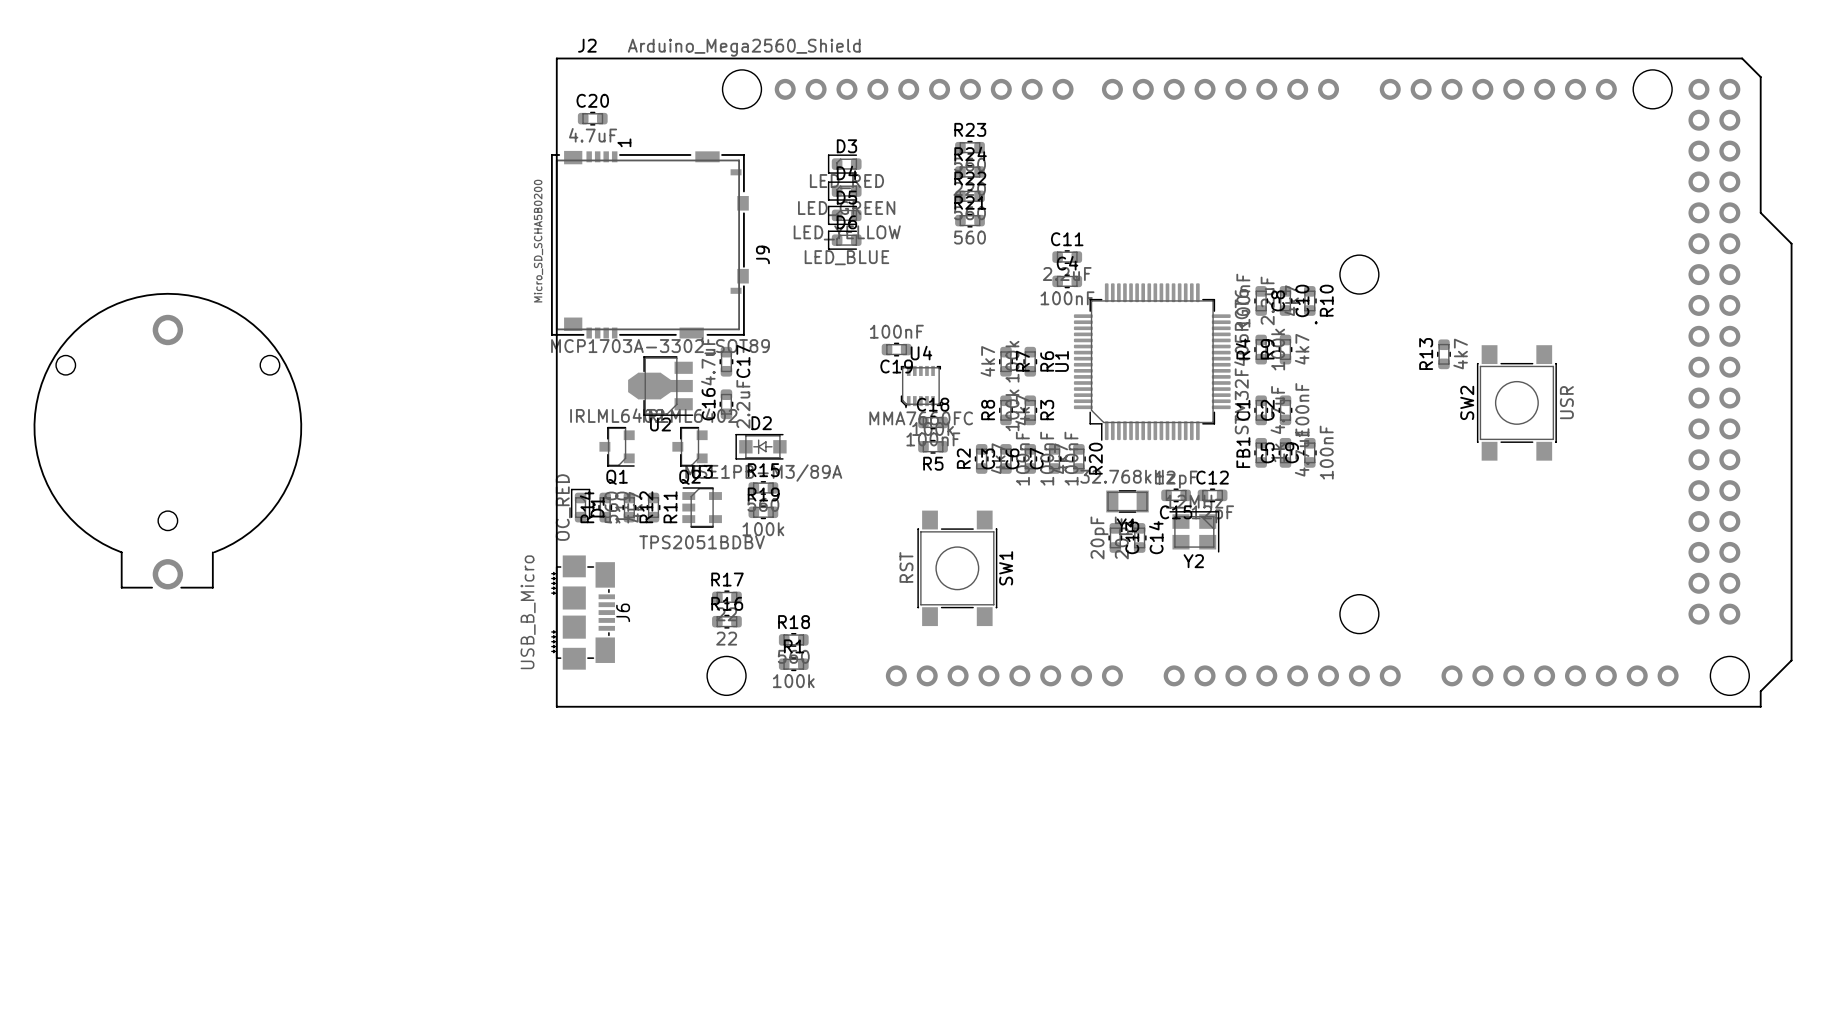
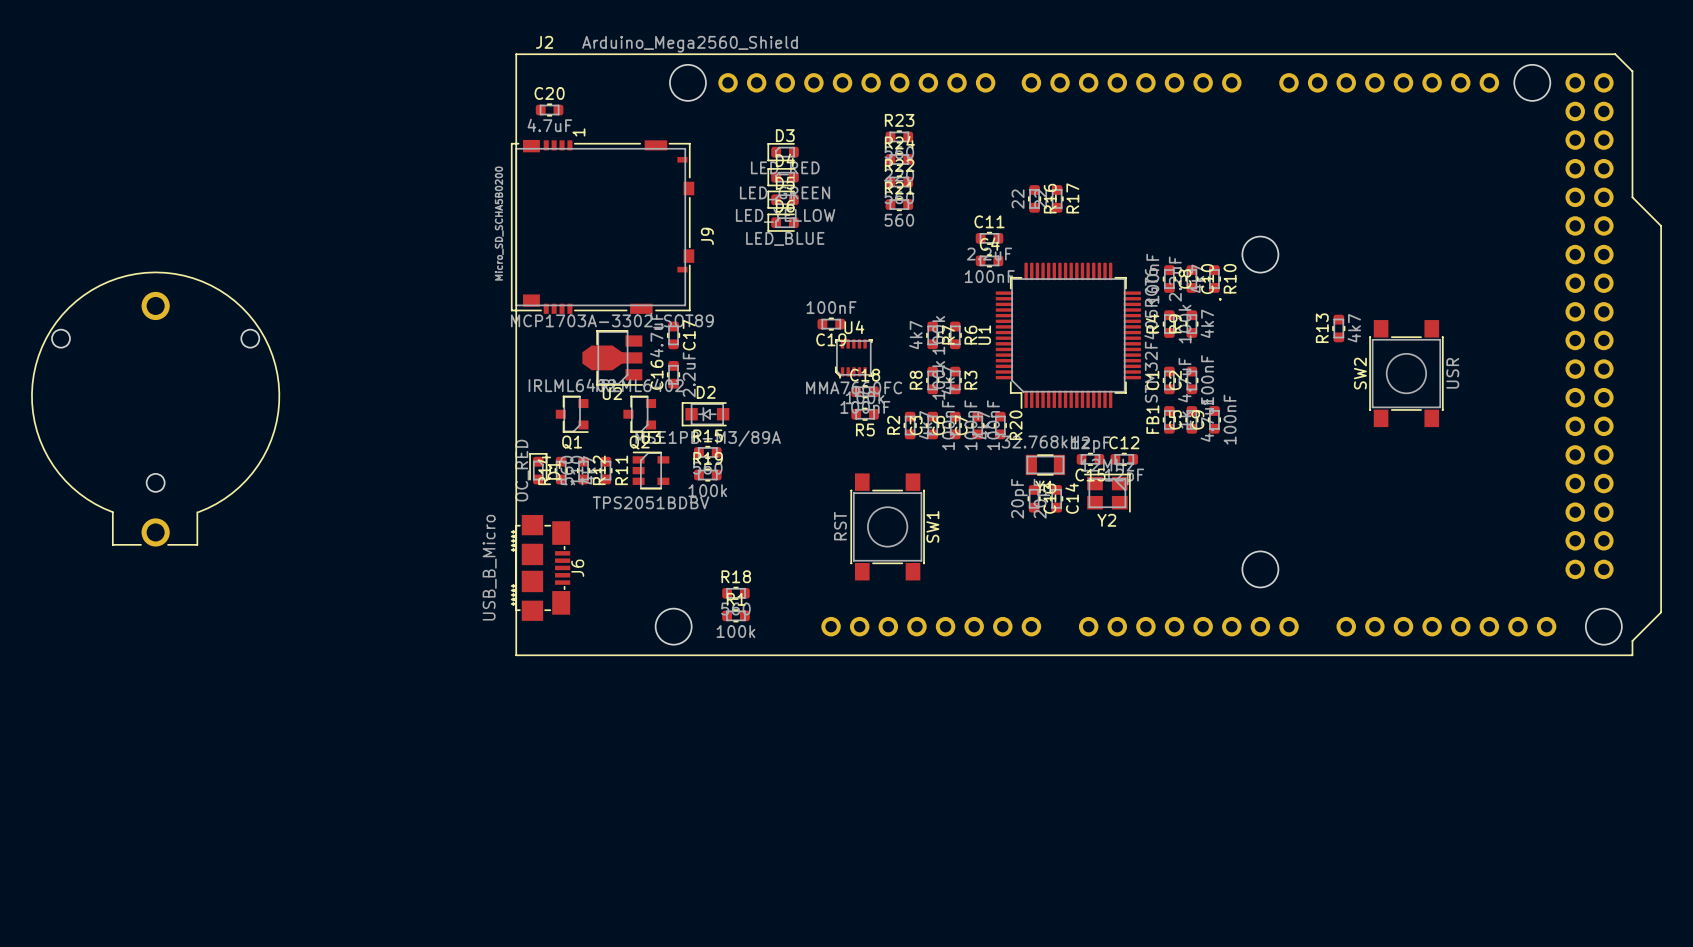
R17 rotation: 0° (726, 597) -> 90° clockwise (1057, 198)
R17 position: (726, 597) -> (1057, 198)
R16 rotation: 0° (726, 621) -> 90° clockwise (1034, 198)
R16 position: (726, 621) -> (1034, 198)

